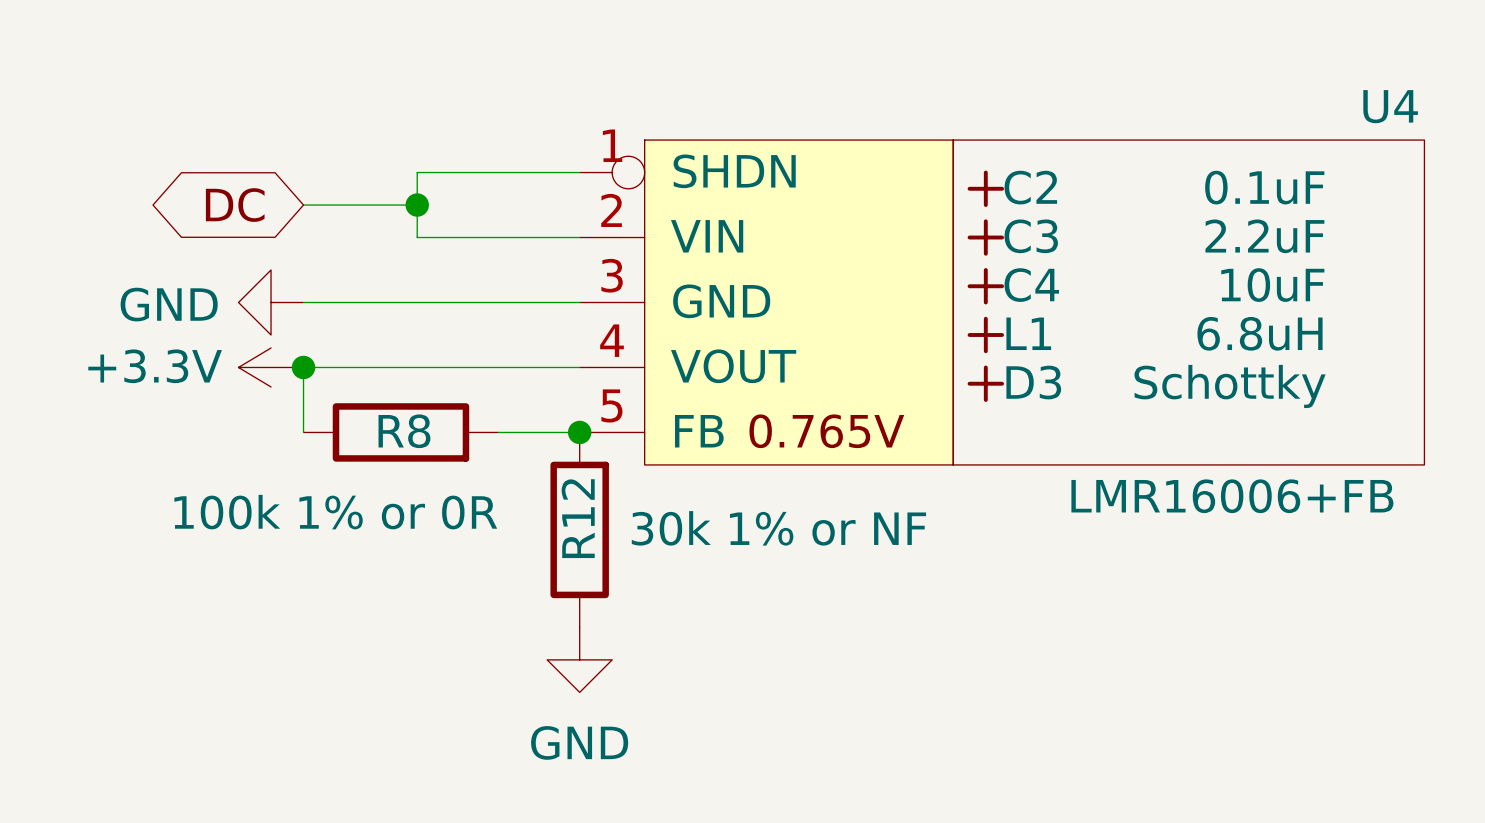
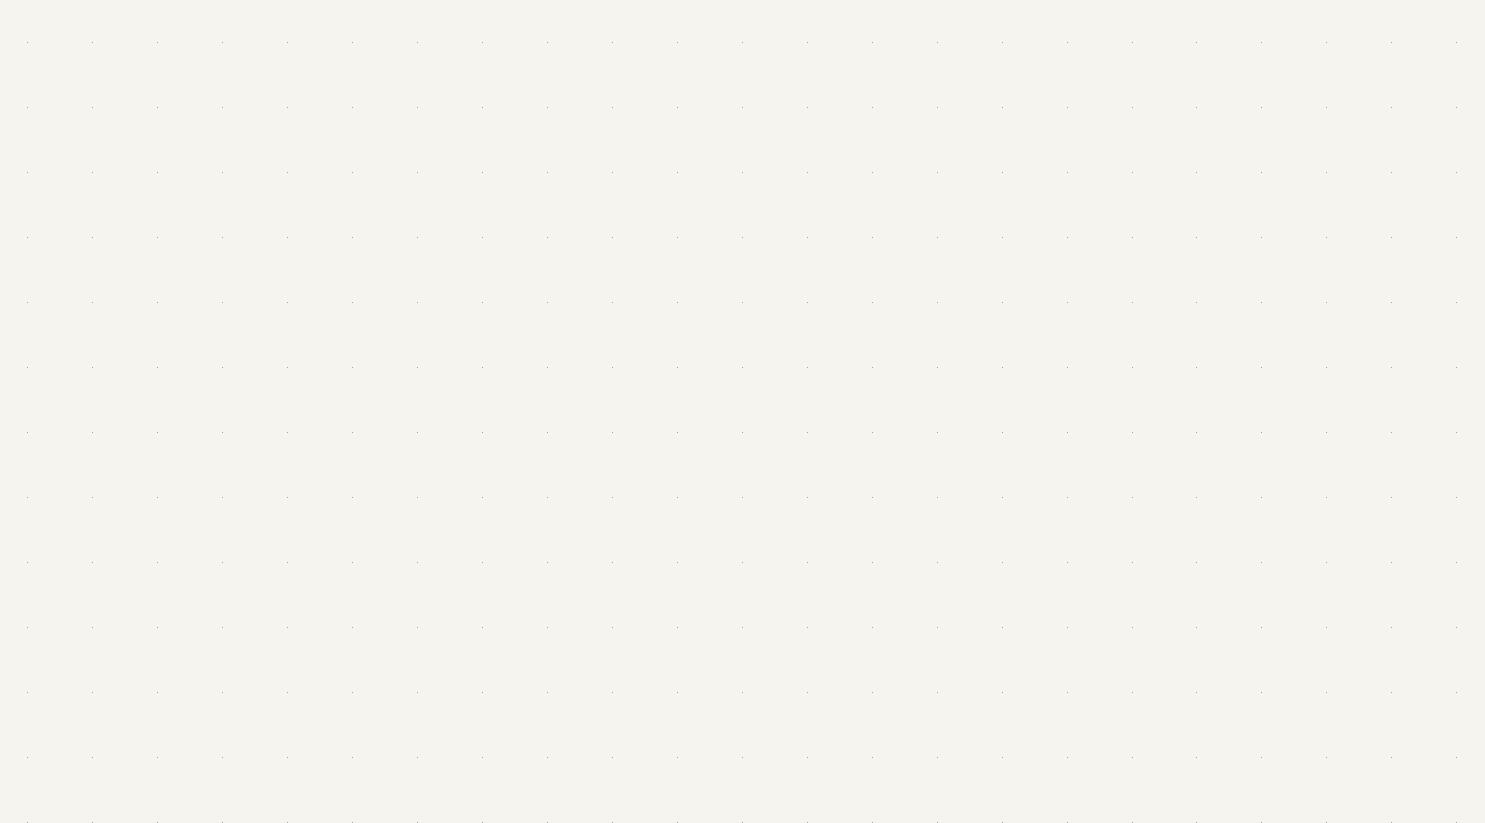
wire: (579, 172) (417, 172) (417, 237) (579, 237) -> none
C2: 0.1uF (985, 188) -> none
global label: DC (235, 205) -> none
wire: (303, 205) (417, 205) -> none
junction: (417, 205) -> none
C3: 2.2uF (985, 237) -> none
C4: 10uF (985, 286) -> none
power symbol: GND (271, 302) -> none
wire: (303, 302) (579, 302) -> none
U4: LMR16006+FB (1002, 302) -> none
L1: 6.8uH (985, 334) -> none
power symbol: +3.3V (271, 367) -> none
junction: (303, 367) -> none
wire: (579, 367) (303, 367) (303, 432) -> none
D3: Schottky (985, 383) -> none
R8: 100k 1% or 0R (400, 432) -> none
wire: (498, 432) (579, 432) -> none
junction: (579, 432) -> none
R12: 30k 1% or NF (579, 529) -> none
power symbol: GND (579, 659) -> none

